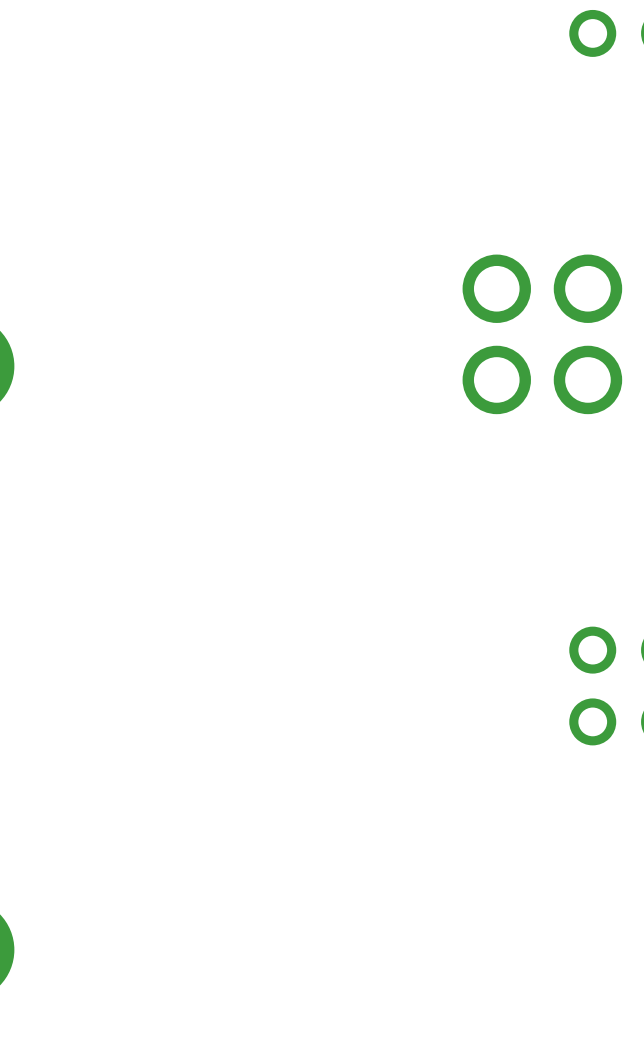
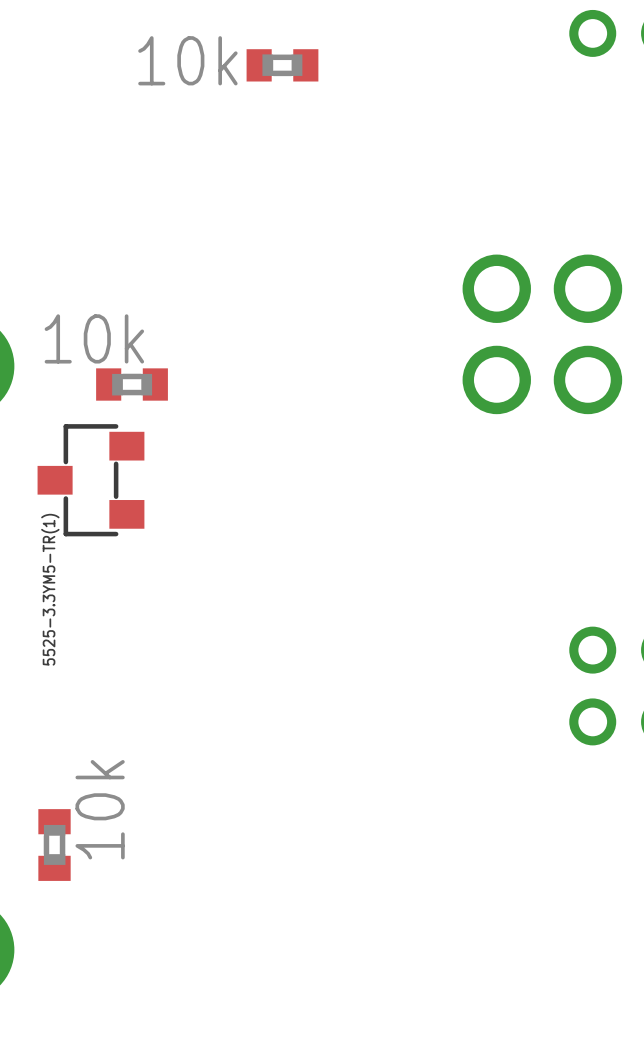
part: none -> 10k (282, 65)
part: none -> 10k (132, 384)
5525-3.3YM5-TR(1): none -> (90, 480)
part: none -> 10k (54, 845)

